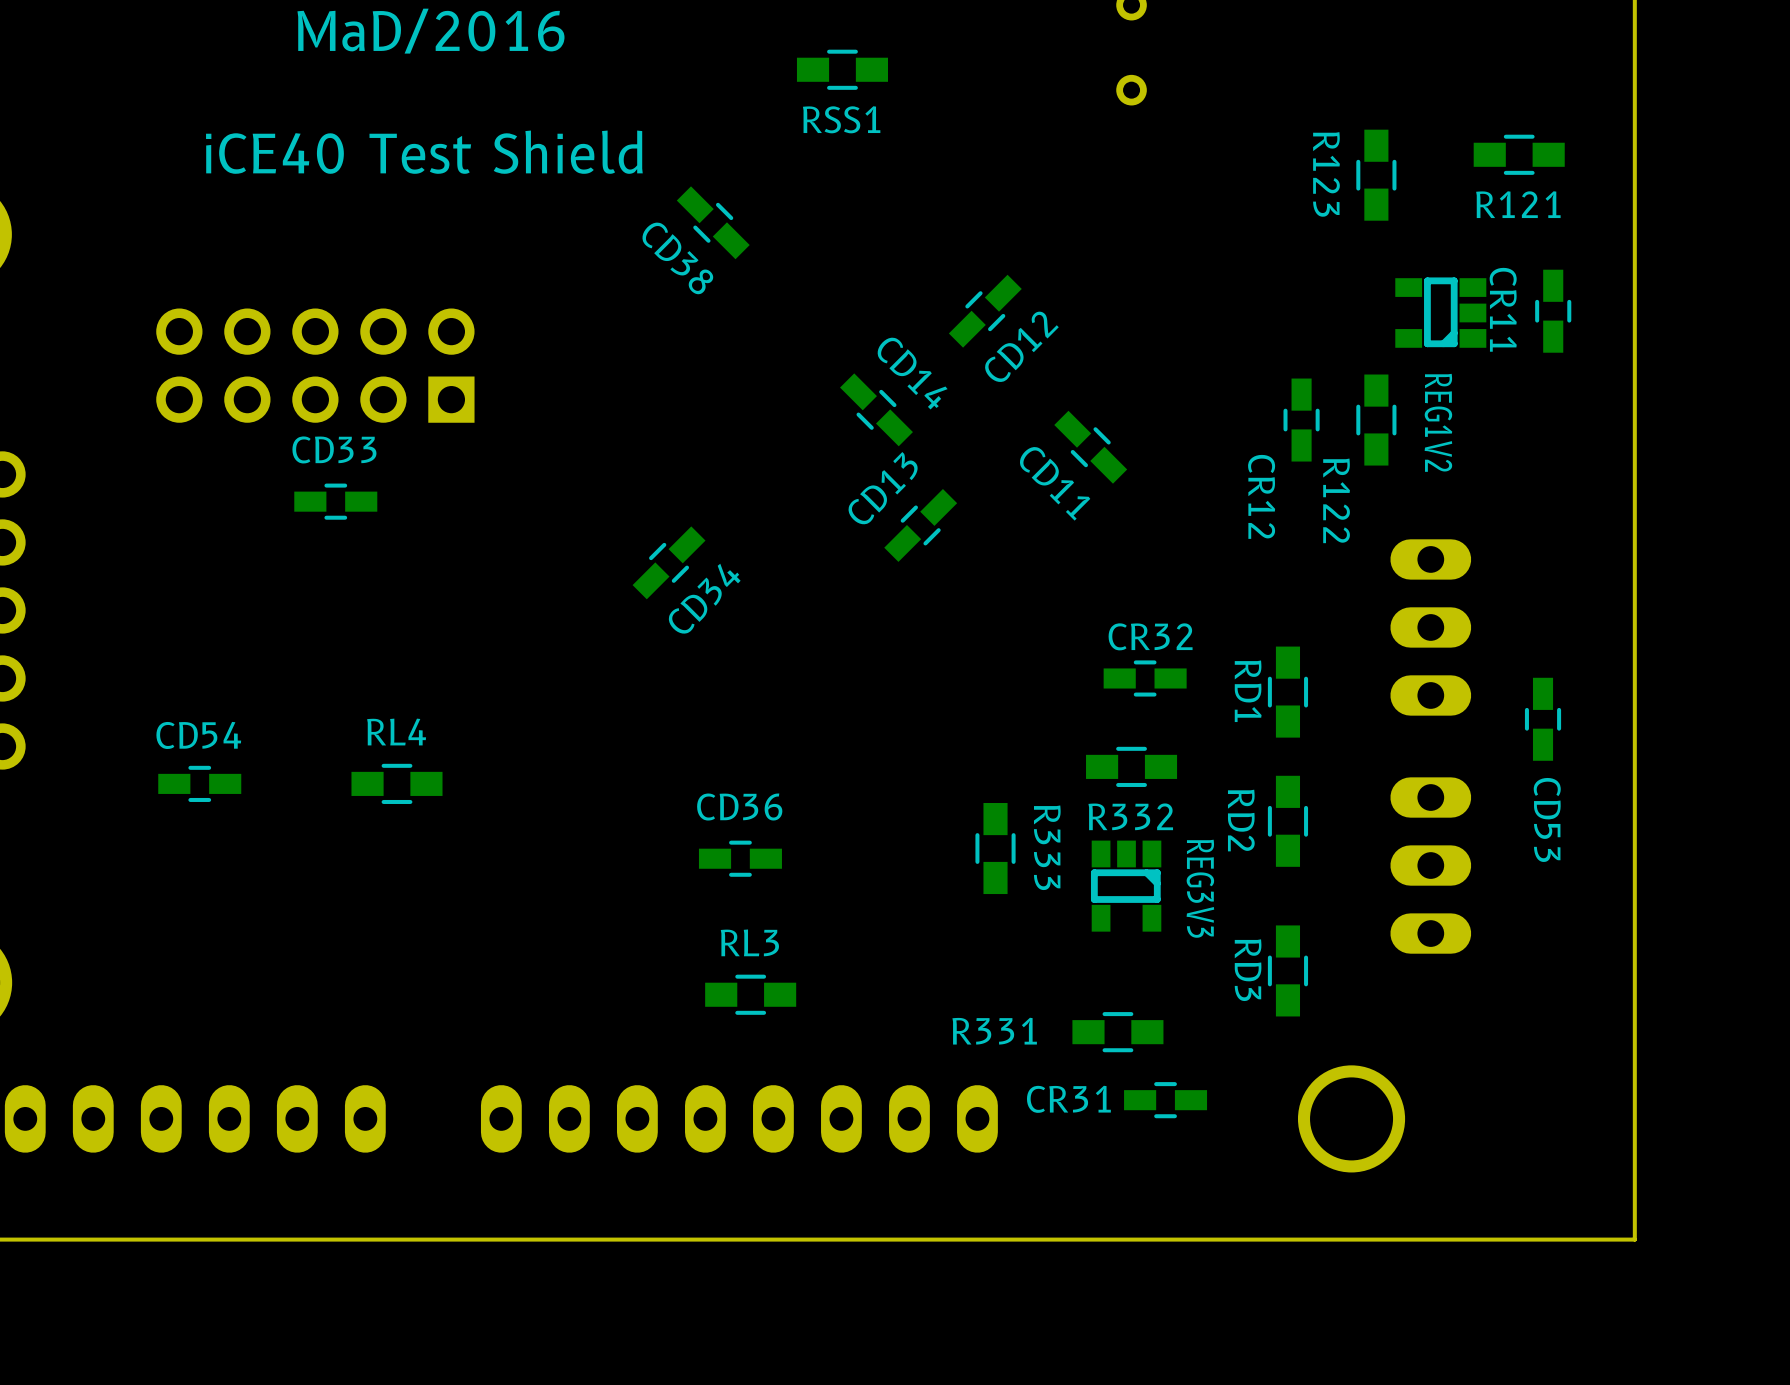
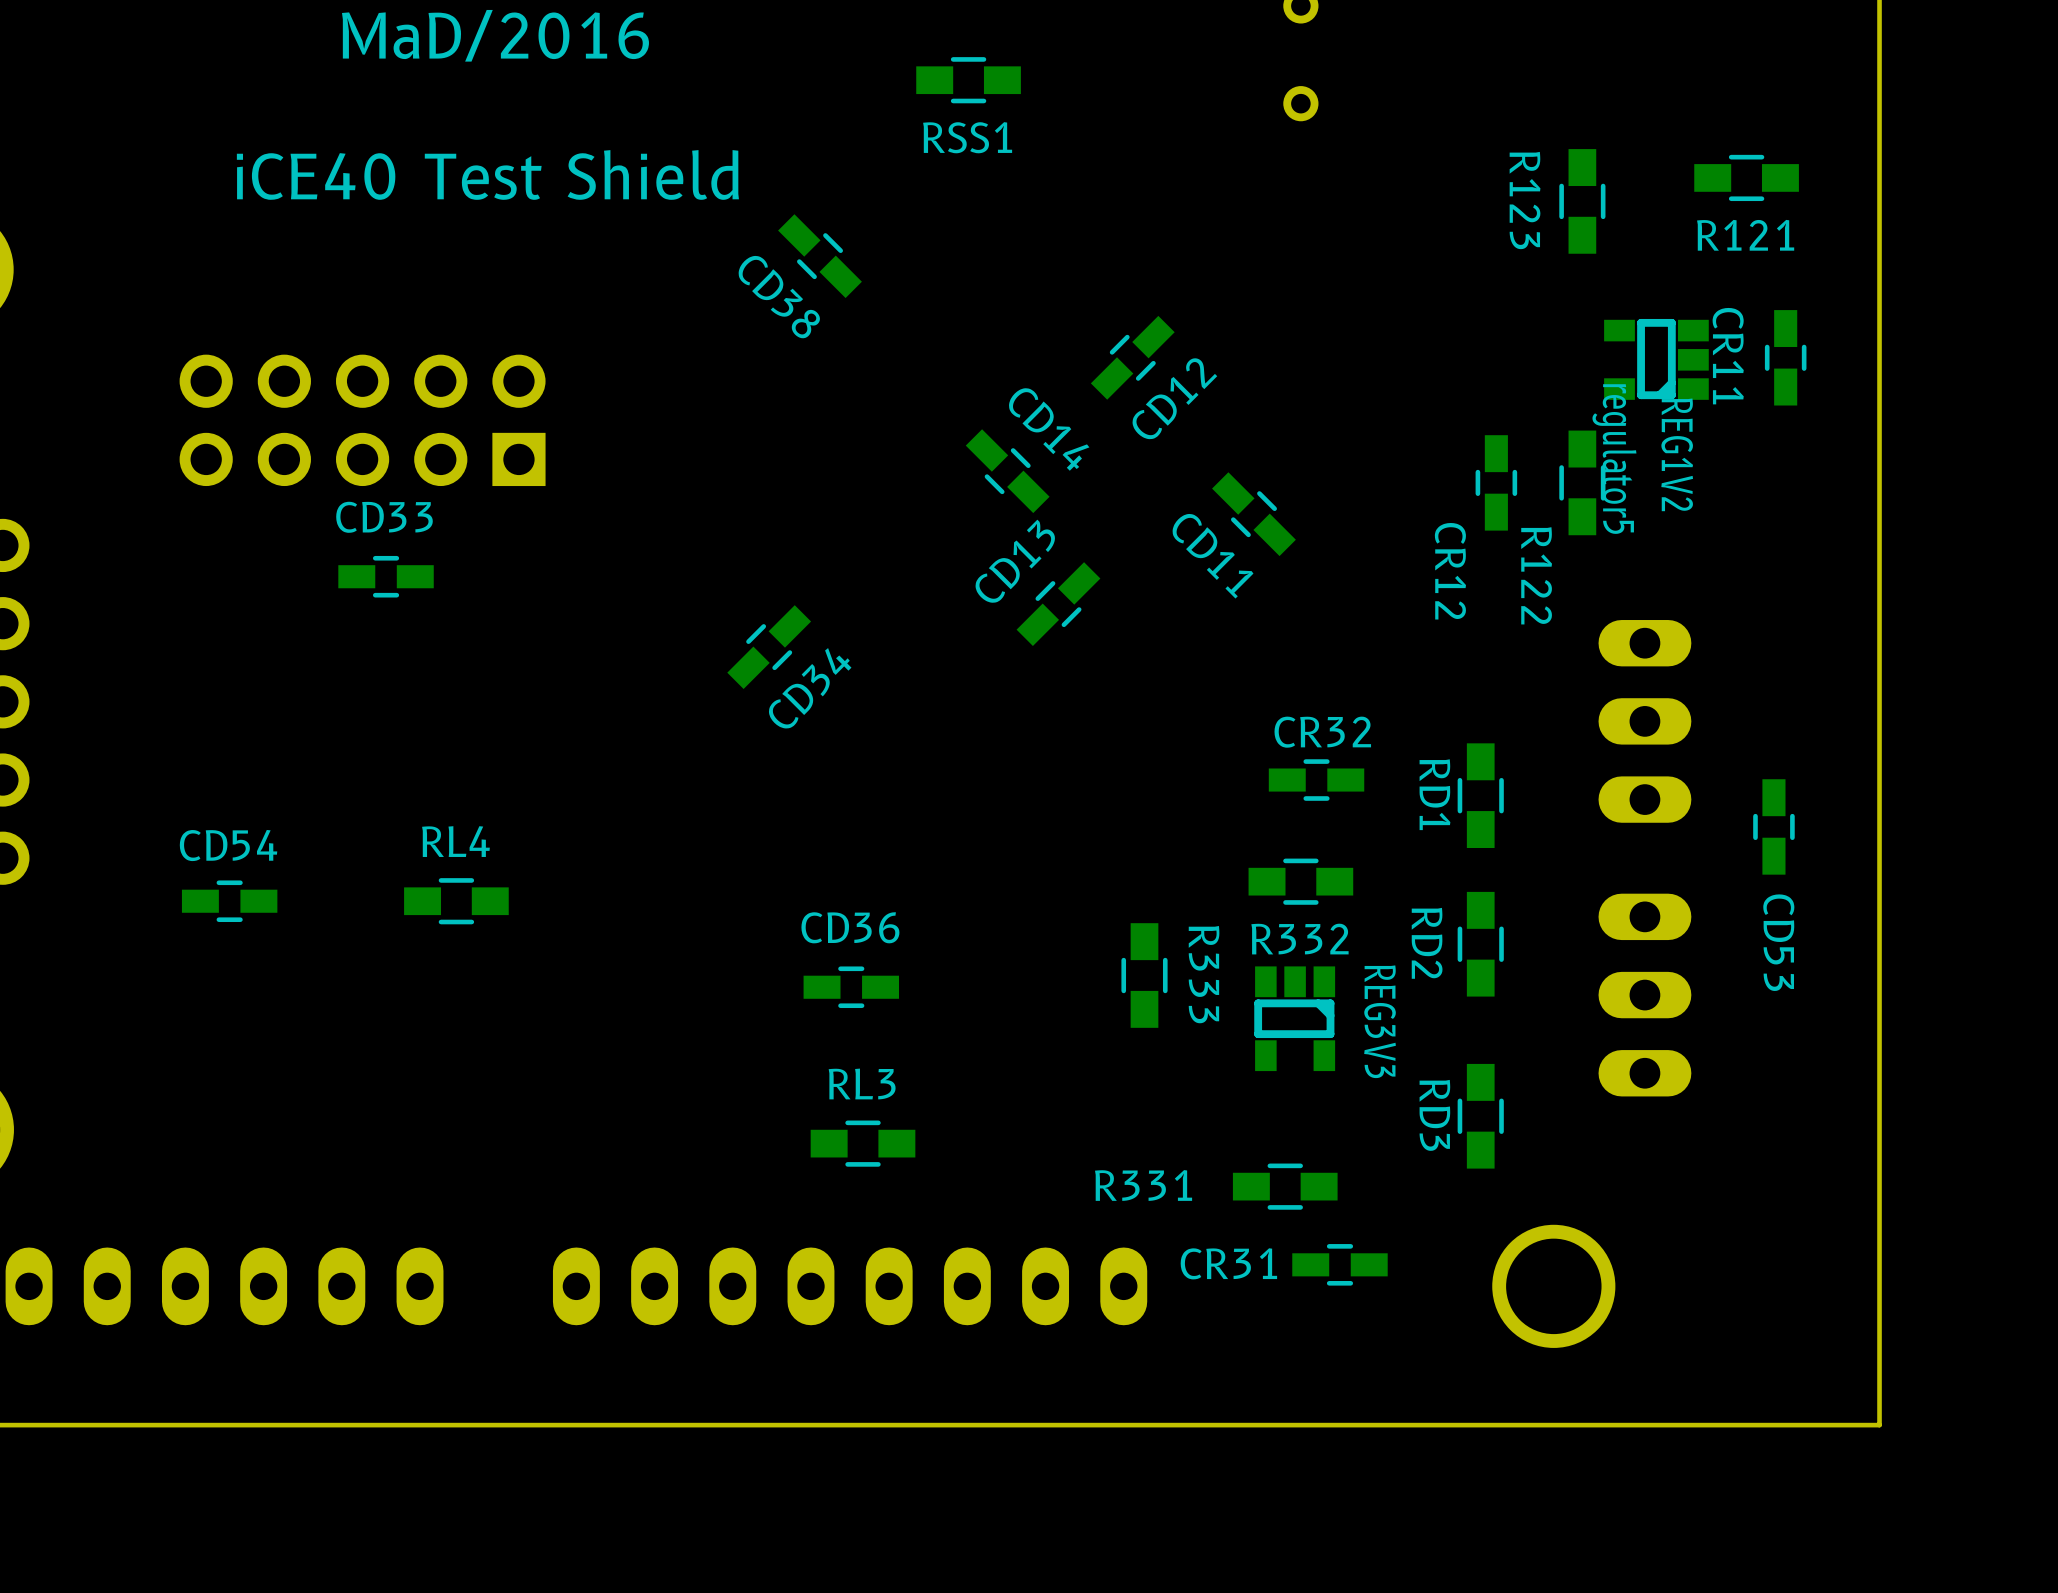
REG1V2 value: none -> regulator5 (1614, 459)
REG1V2 name position: REG1V2 (1438, 422) -> REG1V2 (1677, 454)

